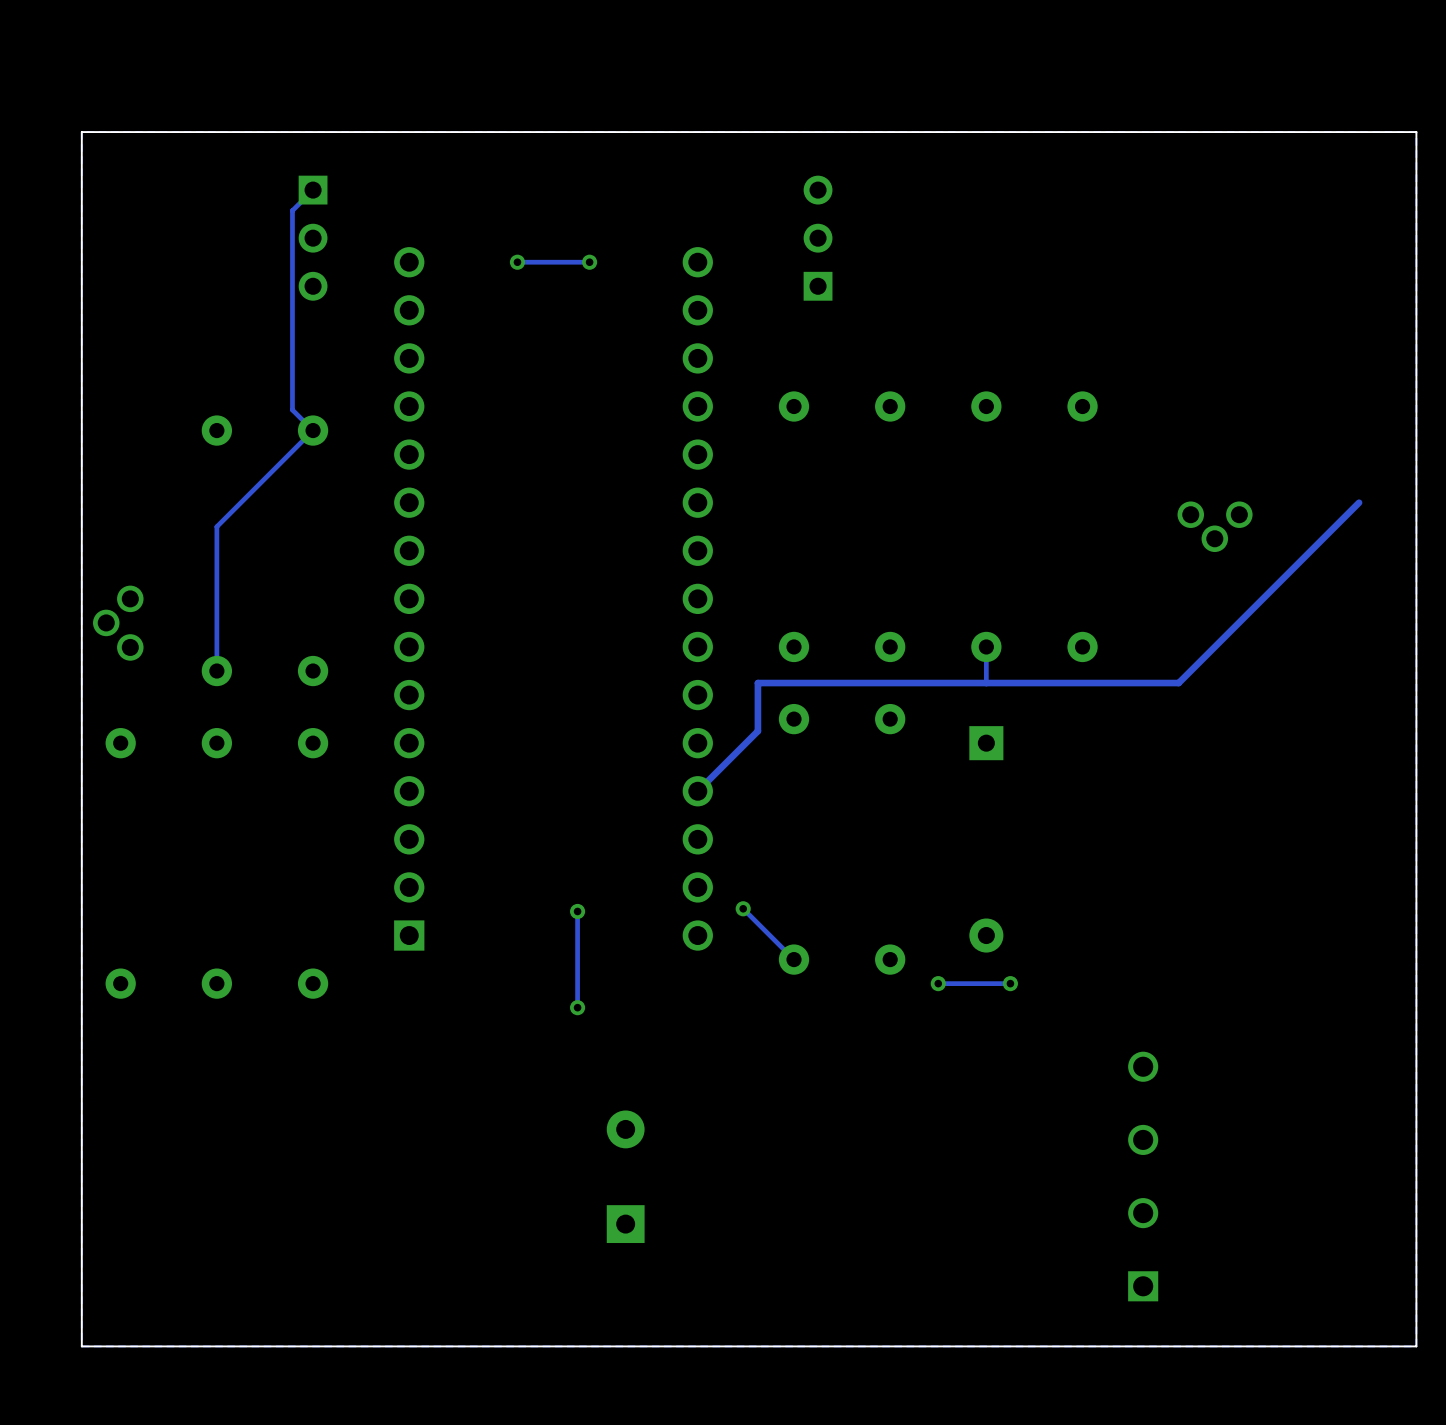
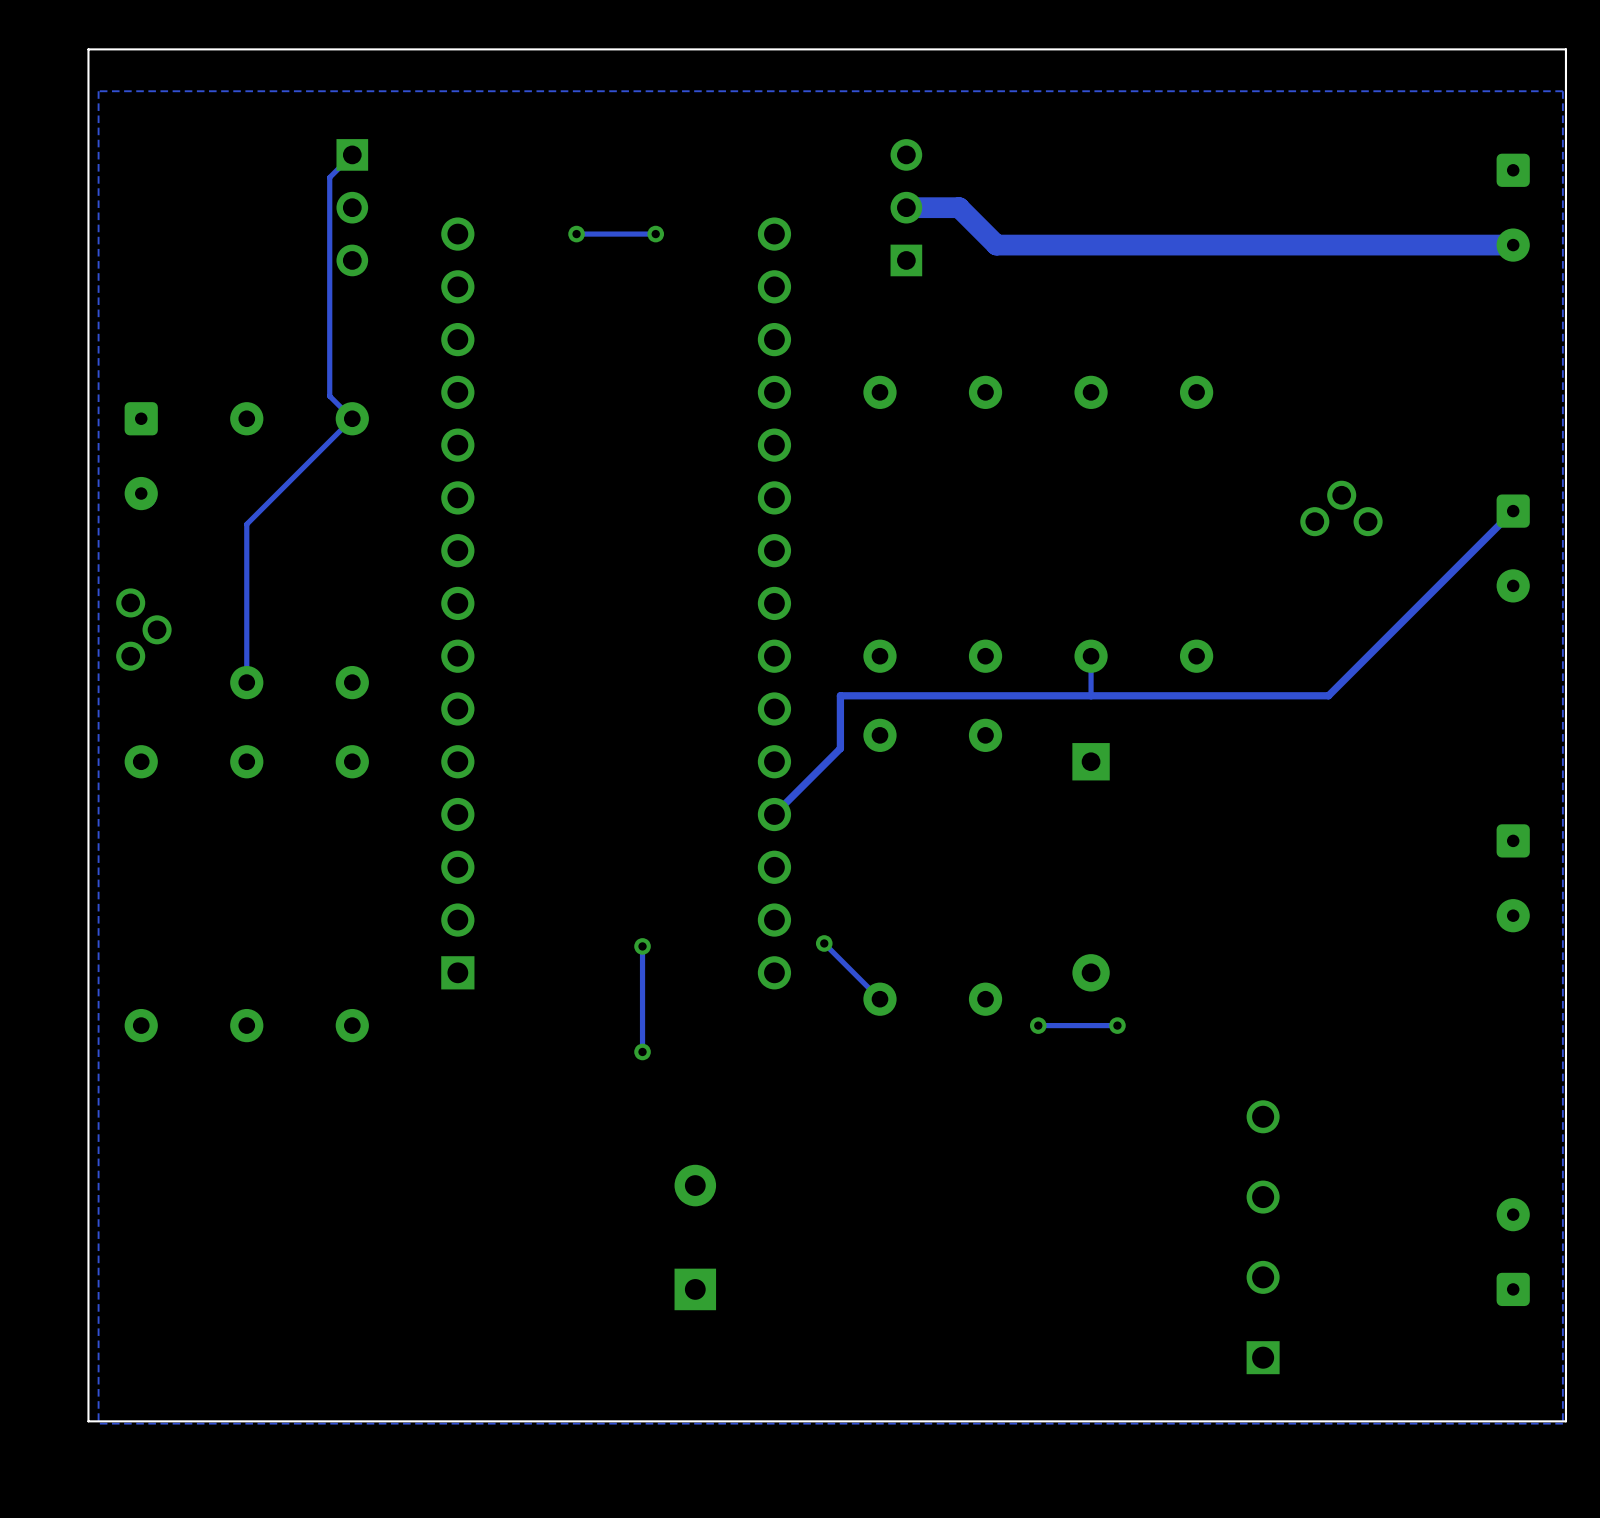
board edge: (1416, 132) (81, 132) (81, 1346) (1416, 1346) (1416, 132) -> (1565, 49) (1565, 1421) (88, 1421) (88, 49) (1565, 49)
track: none -> (906, 207) (959, 207) (996, 245) (1513, 245)
part: none -> (1513, 207)
part: none -> (141, 456)
track: (1359, 502) (1178, 683) -> (1513, 511) (1328, 695) (1302, 695)
part rotation: 0° (1215, 526) -> 180° (1341, 508)
part: none -> (1513, 548)
part rotation: 0° (118, 623) -> 180° (143, 629)
part: none -> (1513, 878)
part: none -> (1513, 1252)

